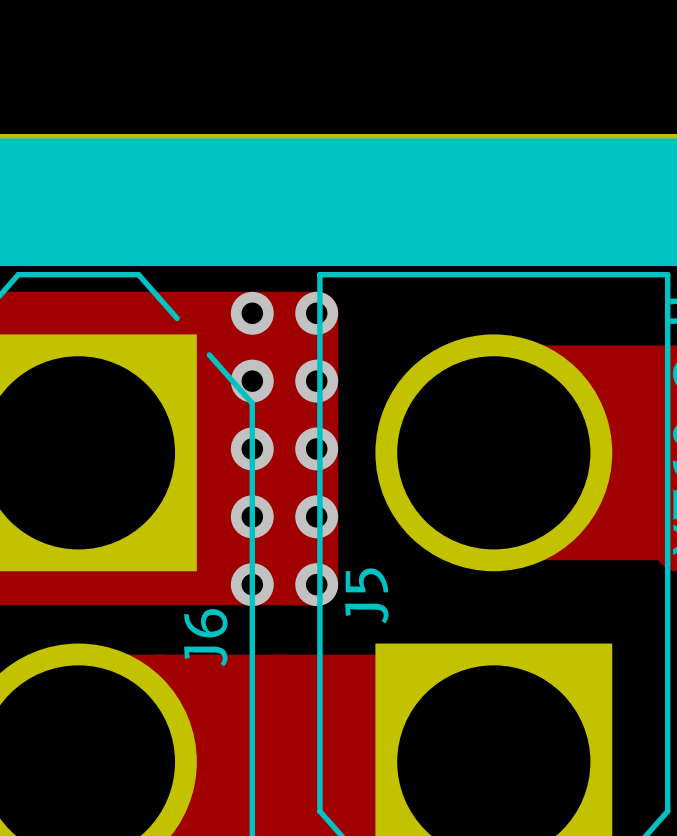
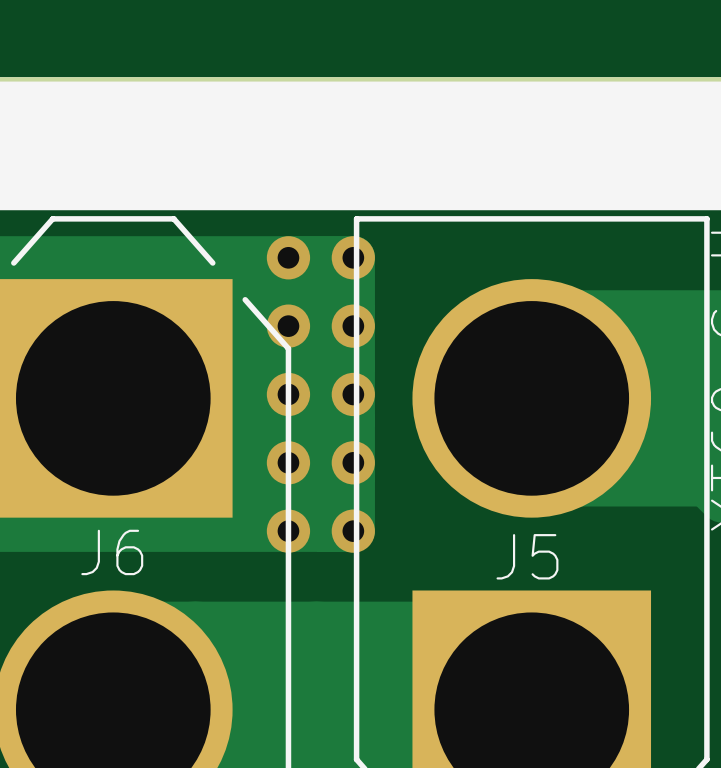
J5 name rotation: 0° (366, 595) -> 90° clockwise (527, 556)
J5 name position: J5 (366, 595) -> J5 (527, 556)
J6 name rotation: 0° (205, 637) -> 90° clockwise (112, 552)
J6 name position: J6 (205, 637) -> J6 (112, 552)

